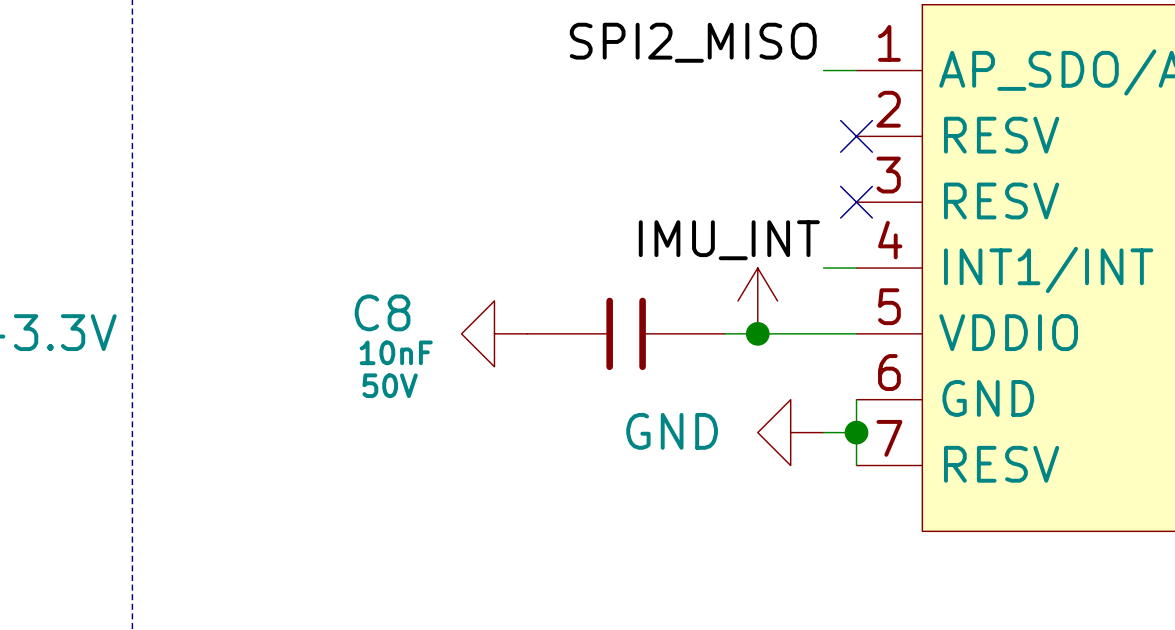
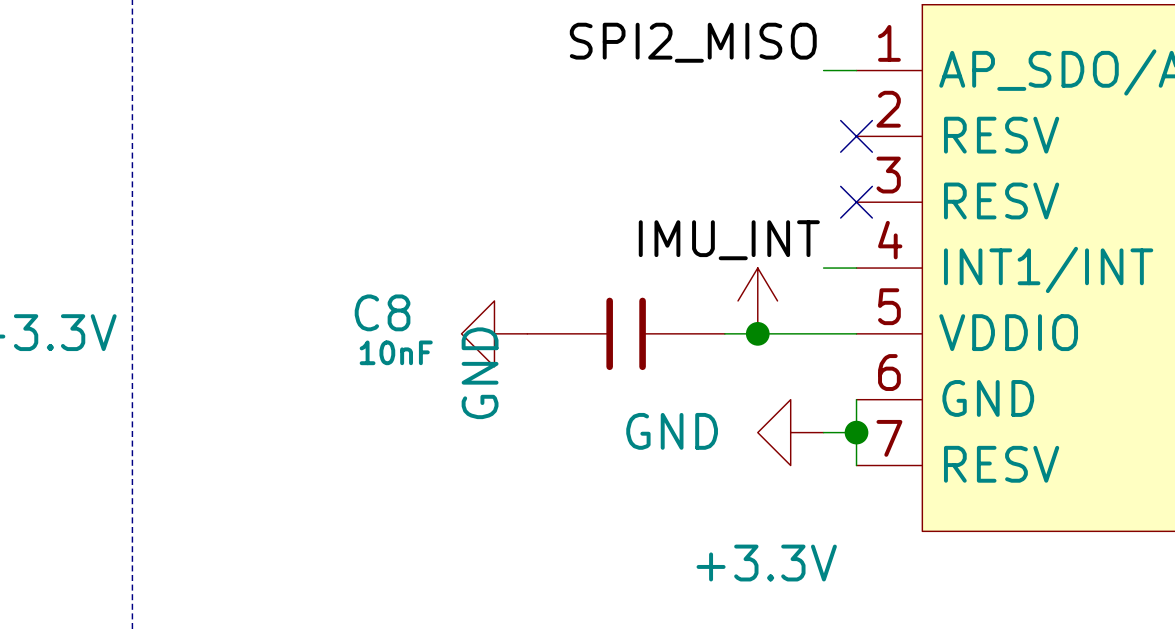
power symbol text: none -> GND (480, 373)
C8 text: 50V (390, 385) -> none
power symbol text: none -> +3.3V (766, 563)

